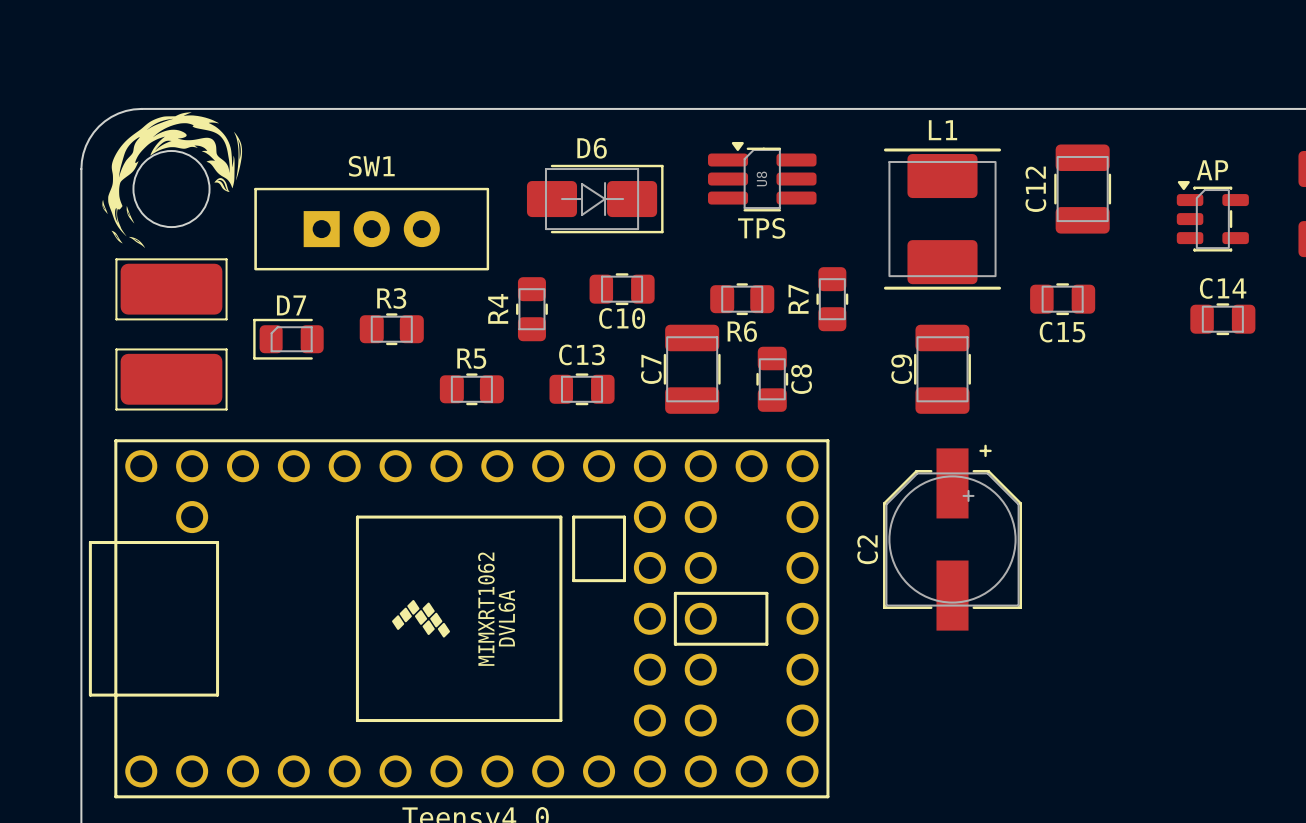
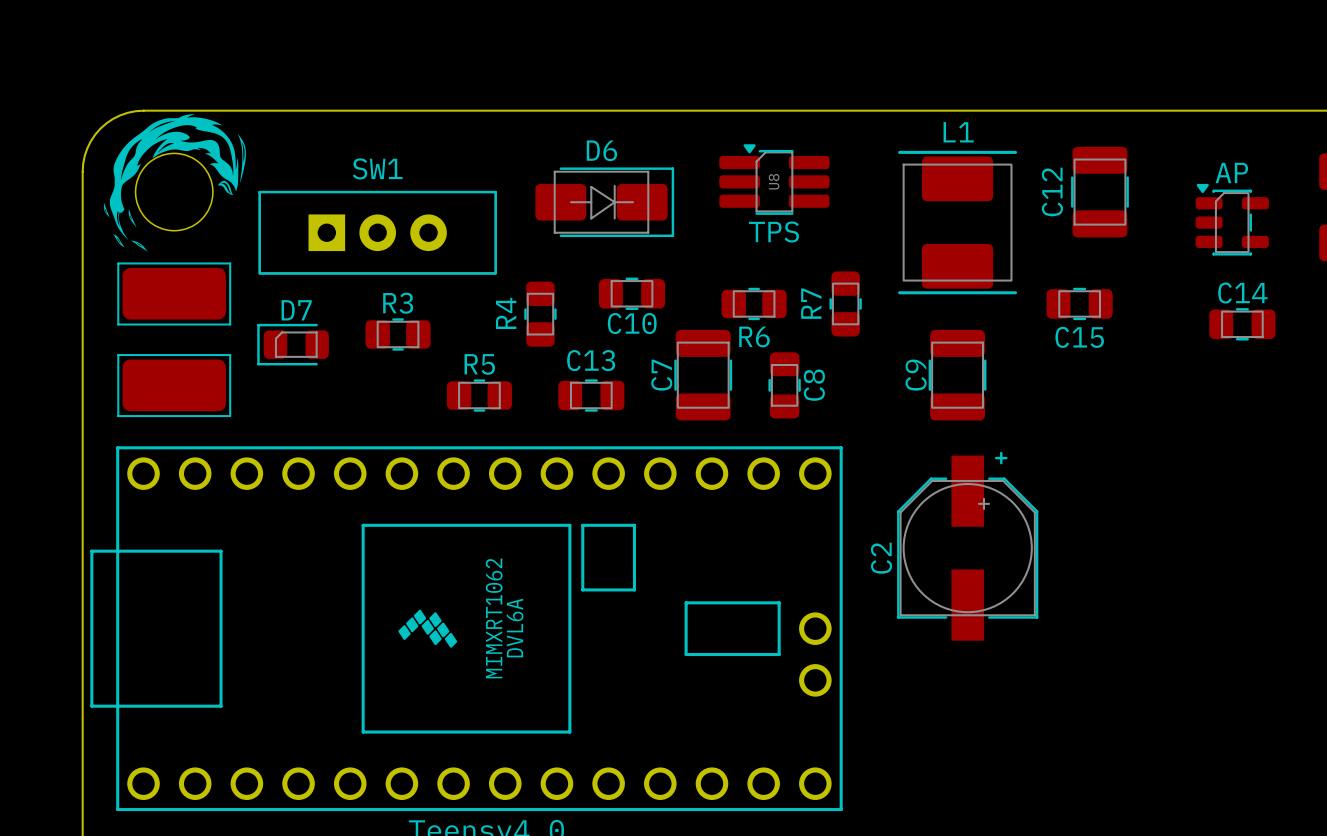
part footprint: [88, 439, 830, 799] -> [90, 446, 843, 812]

